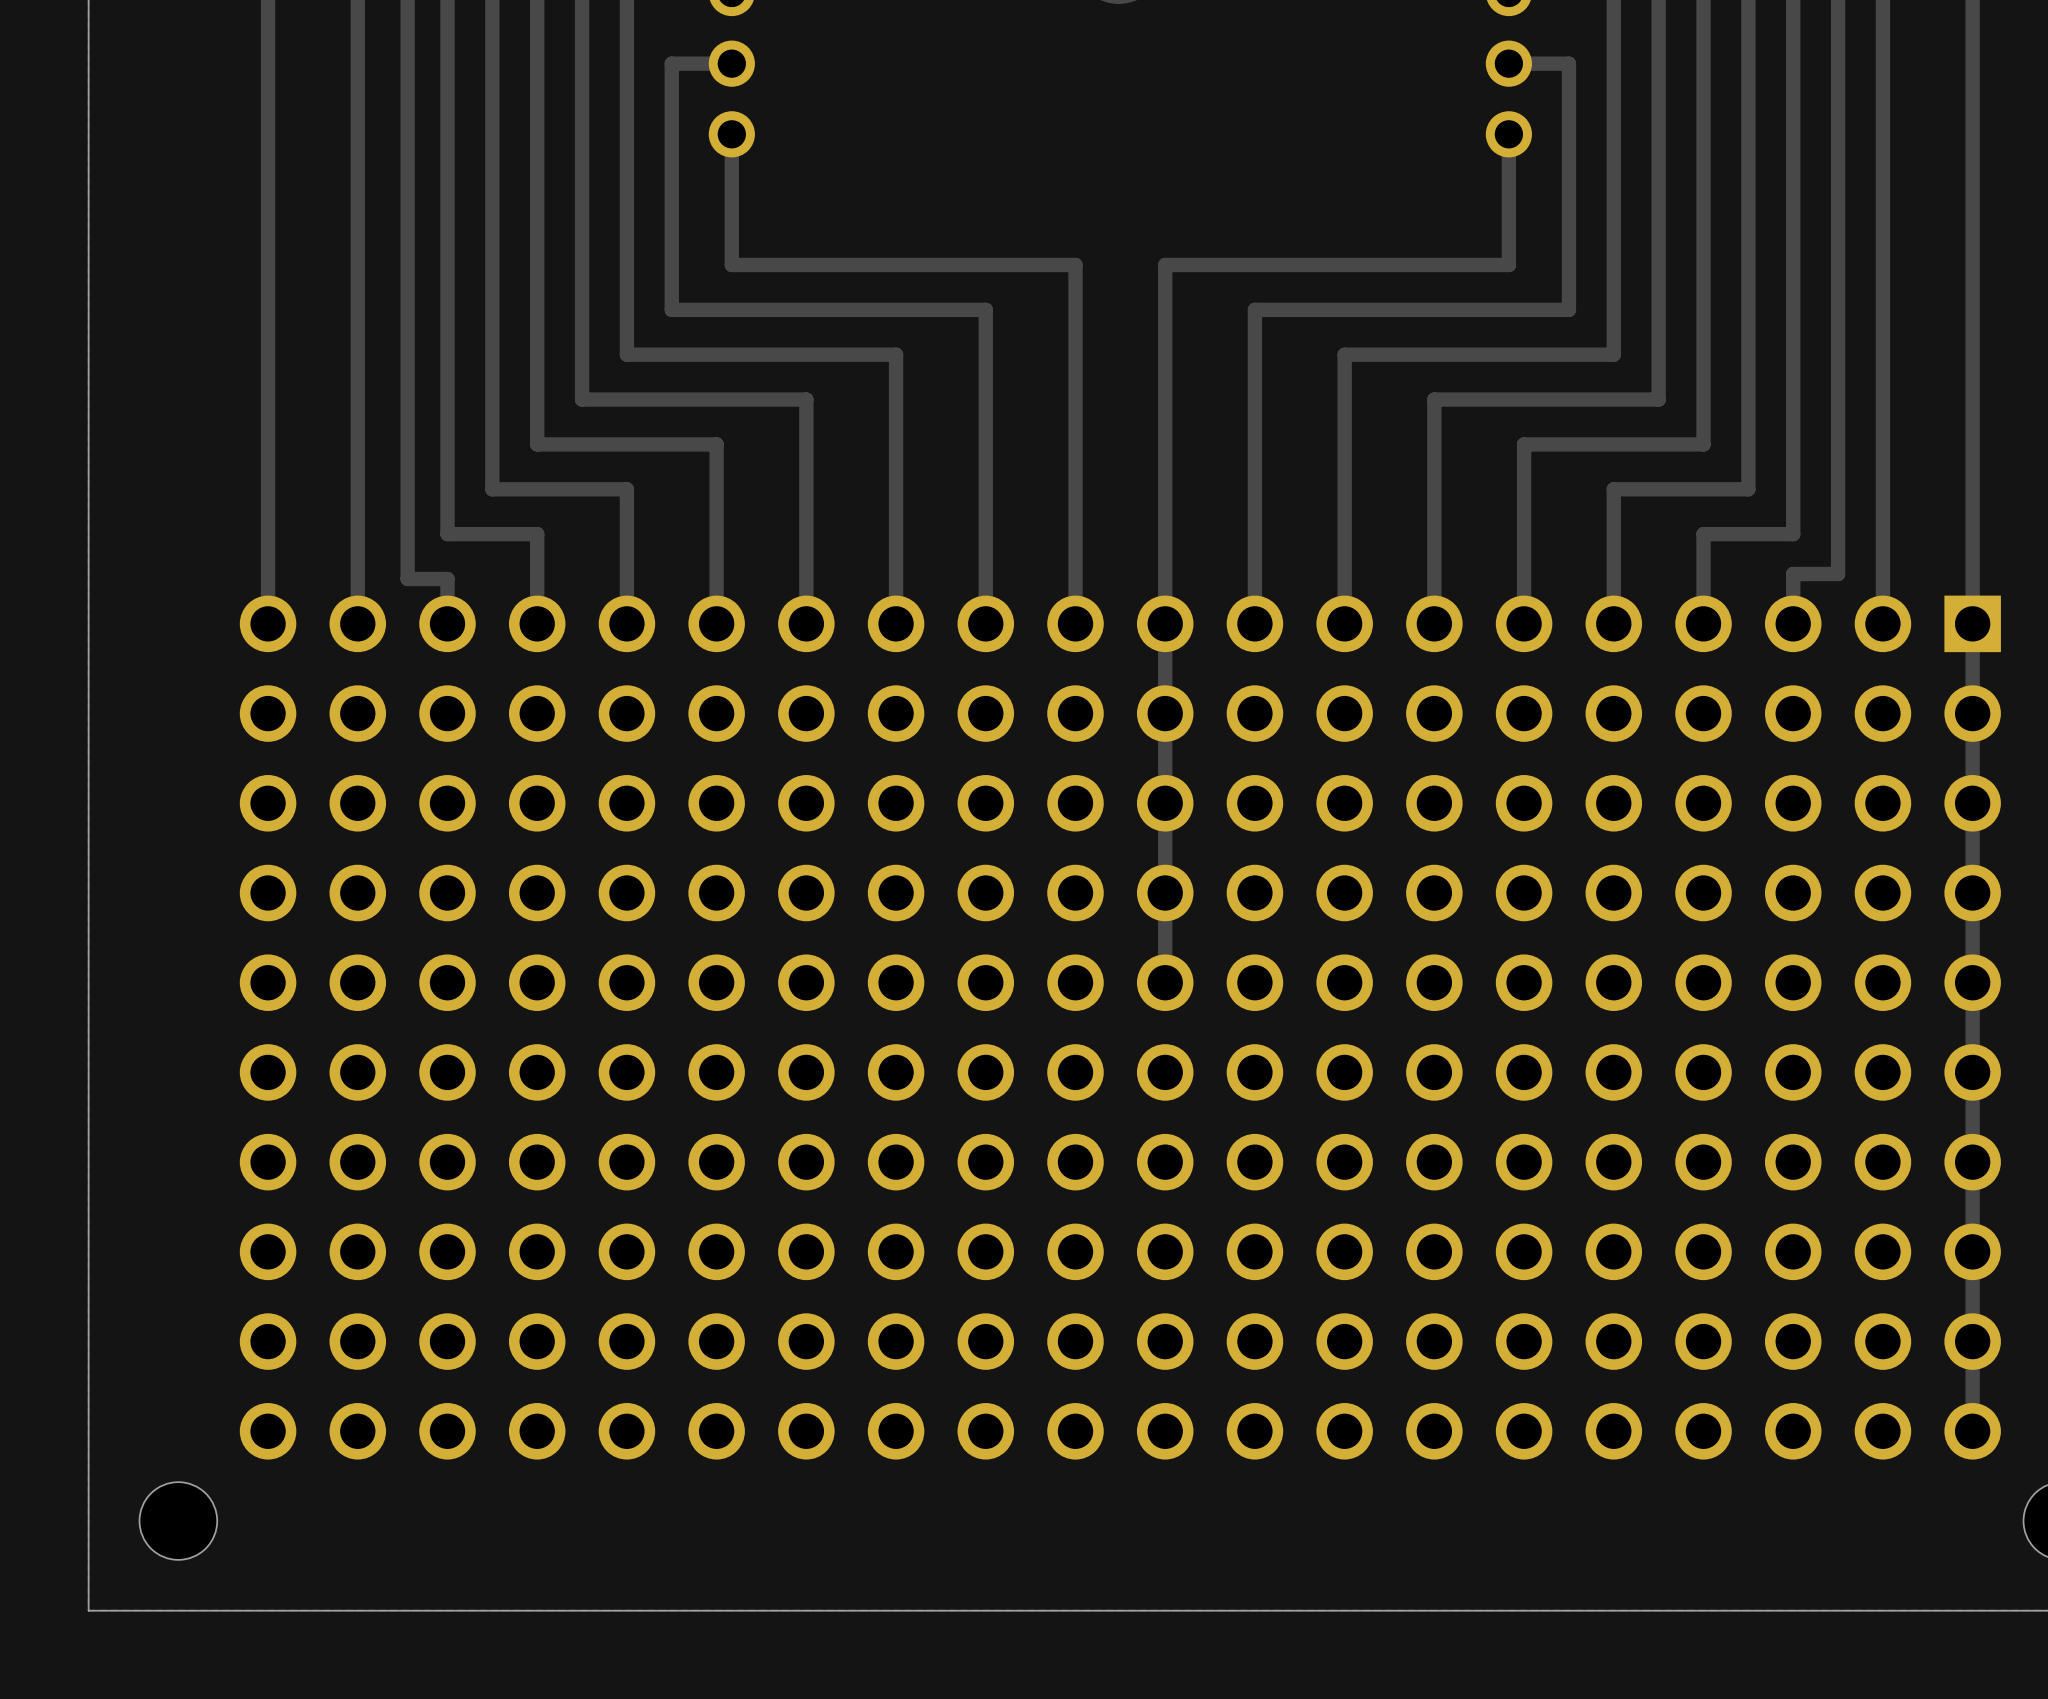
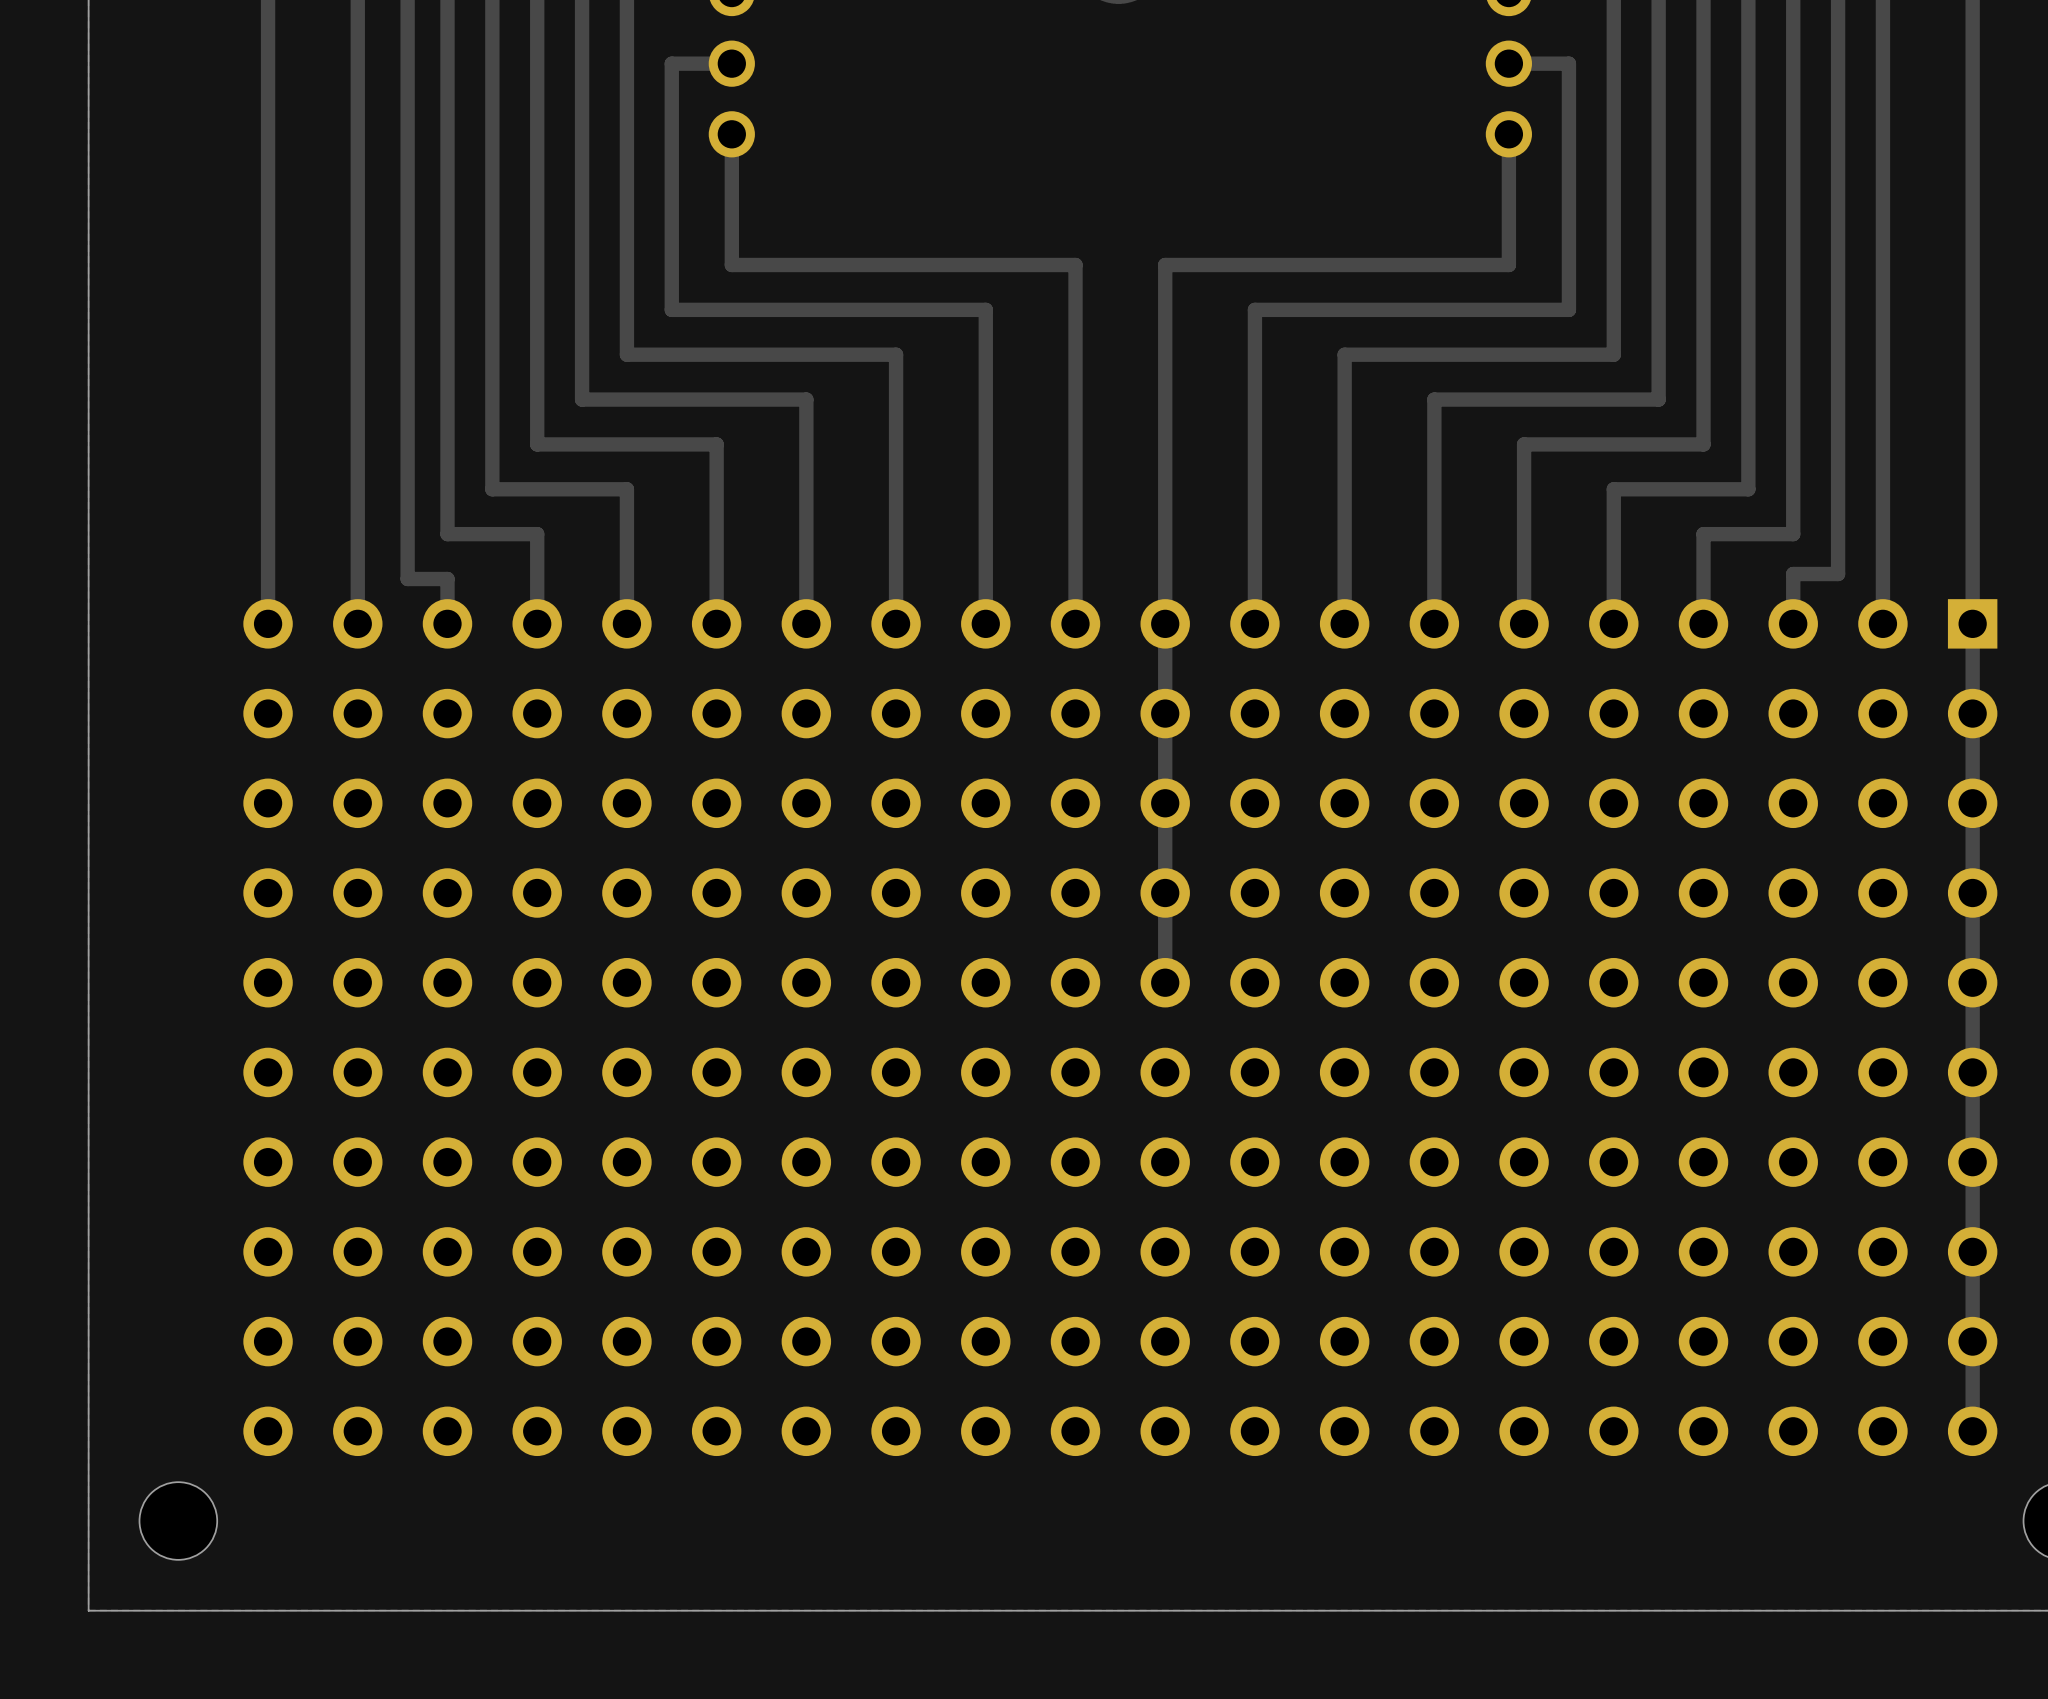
part footprint: [239, 595, 2001, 1460] -> [243, 599, 1998, 1457]

